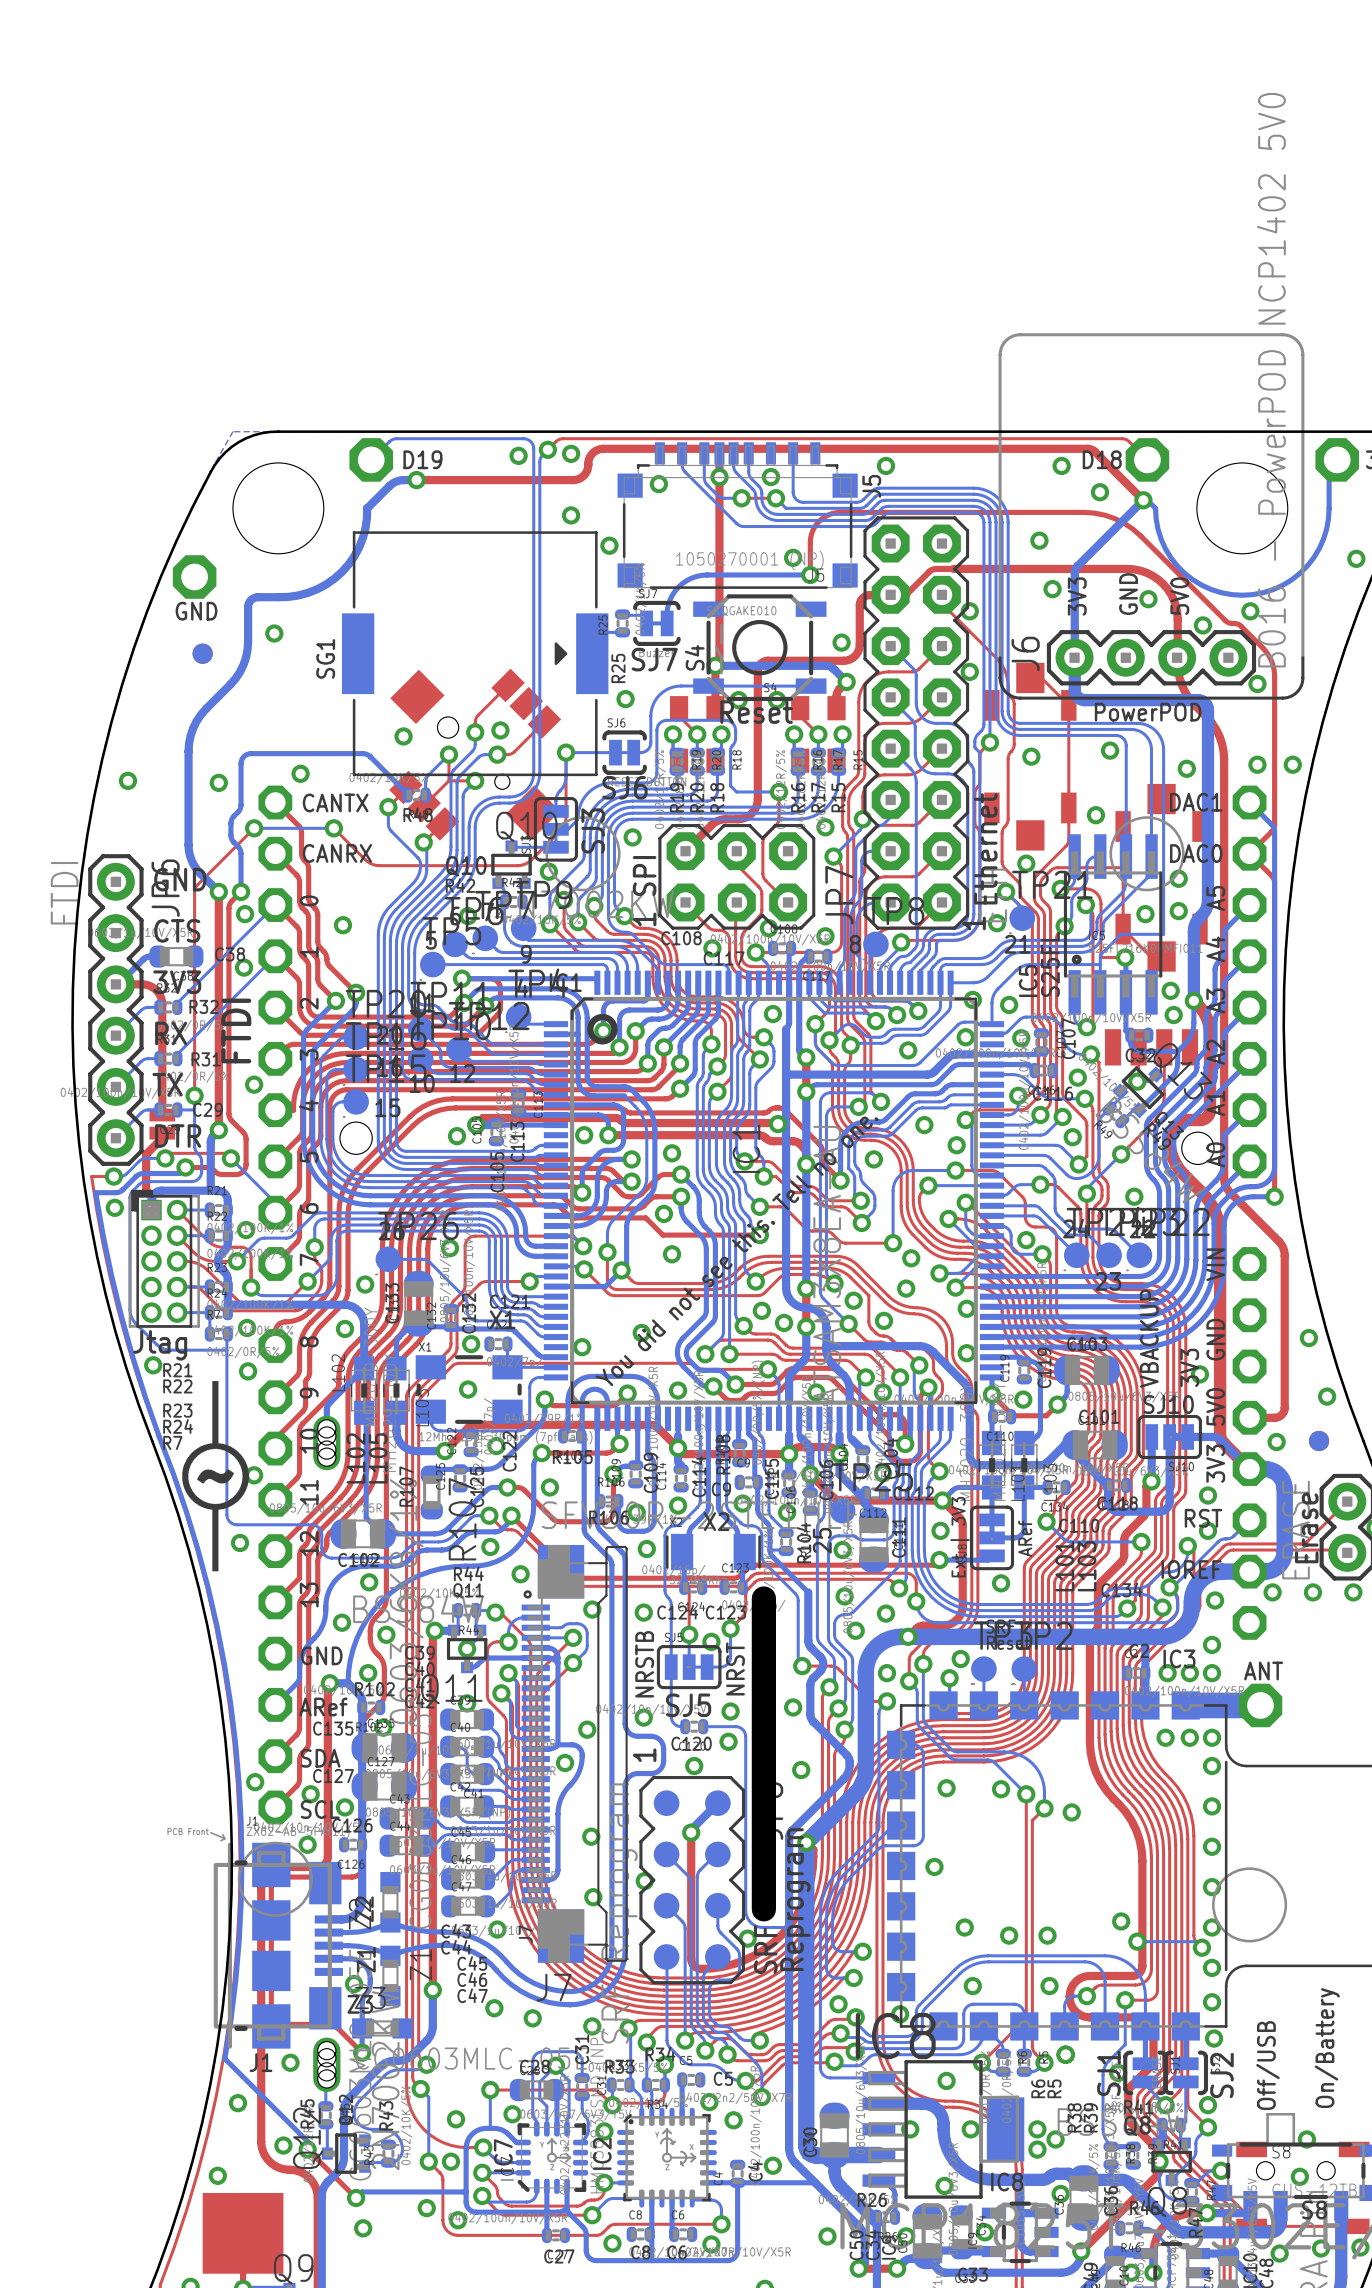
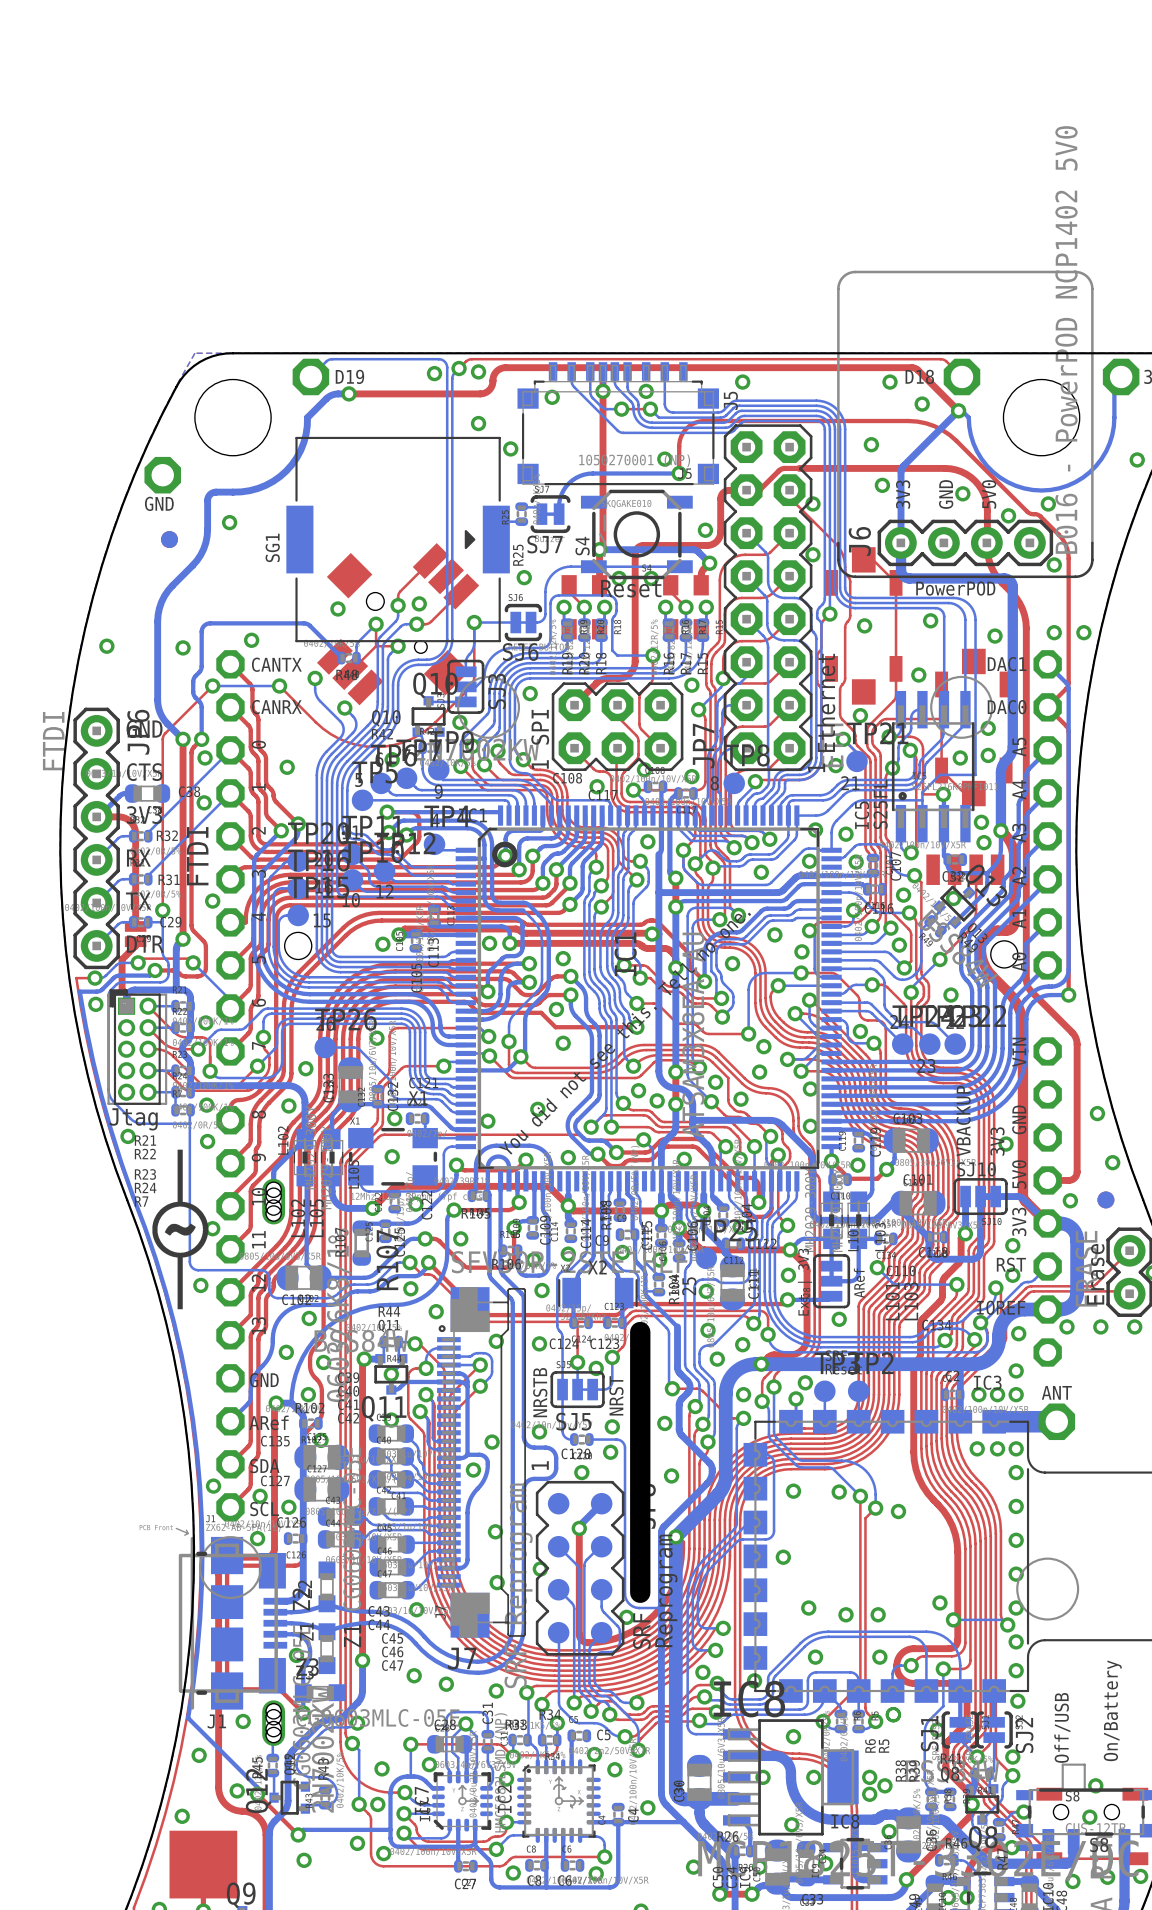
part footprint: [389, 668, 562, 841] -> [316, 543, 480, 706]
bottom track: (388, 807) (389, 829) (420, 862) (417, 878) (406, 890) -> (315, 678) (317, 697) (342, 725) (343, 731) (340, 738)
via position: (388, 807) -> (315, 678)
bottom track: (423, 842) (426, 845) (426, 872) (420, 885) -> (344, 708) (355, 721) (355, 727) (352, 733)
via position: (423, 842) -> (344, 708)
top track: (531, 859) (525, 864) (517, 865) (379, 865) (371, 864) (365, 859) -> (445, 712) (428, 728) (412, 738) (394, 744) (375, 747) (356, 744) (338, 738) (322, 728) (305, 712)

